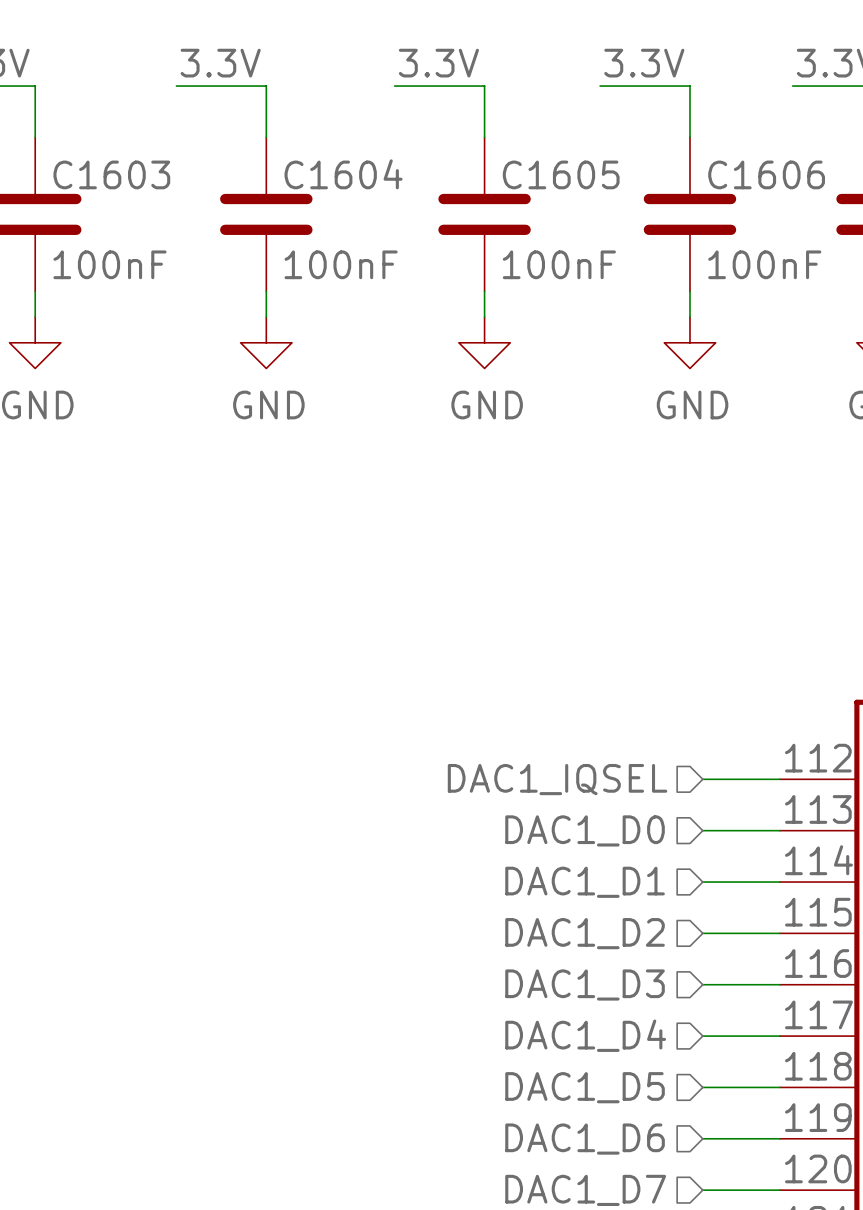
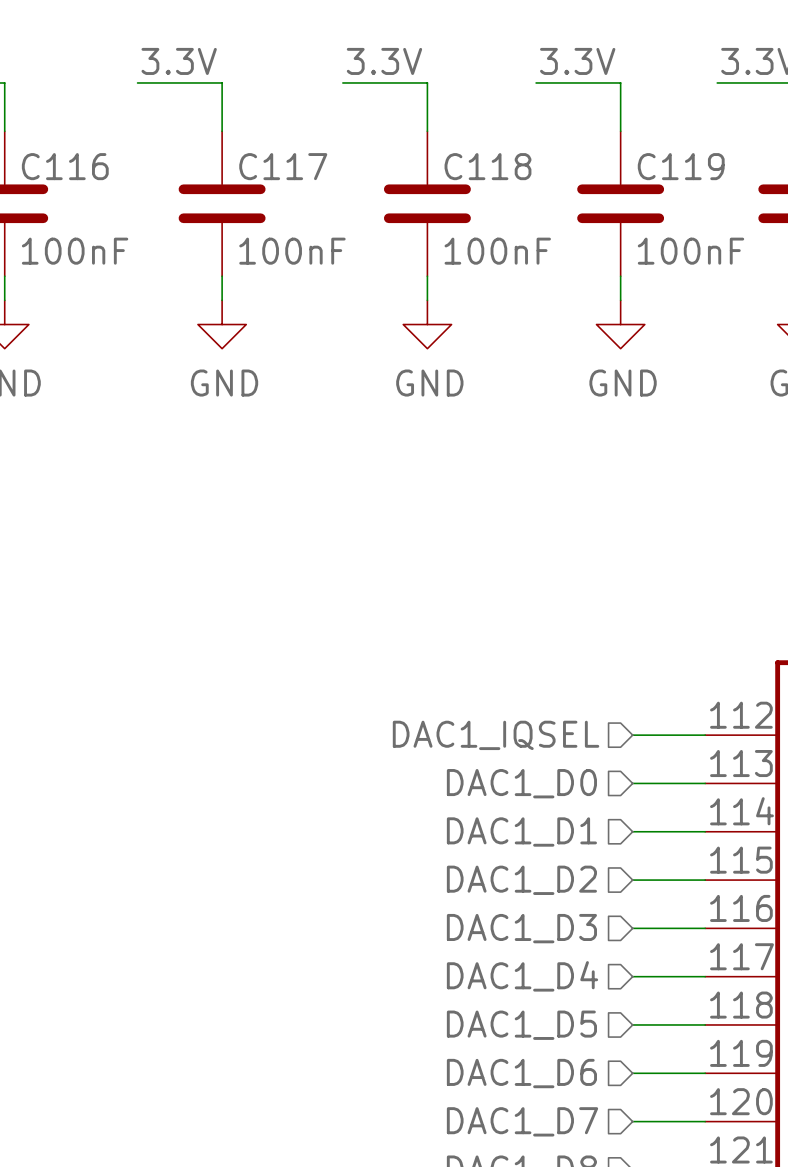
C1603 name: C1603 (111, 174) -> C116 (65, 166)
C1604 name: C1604 (343, 174) -> C117 (283, 166)
C1605 name: C1605 (561, 174) -> C118 (487, 166)
C1606 name: C1606 (766, 174) -> C119 (681, 166)

